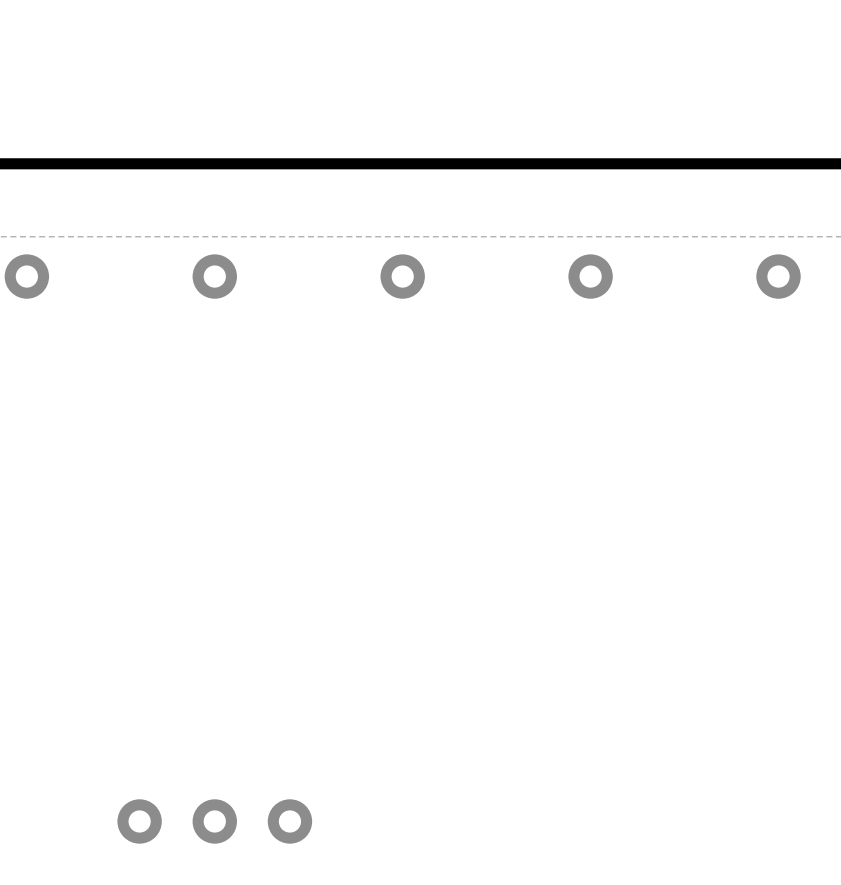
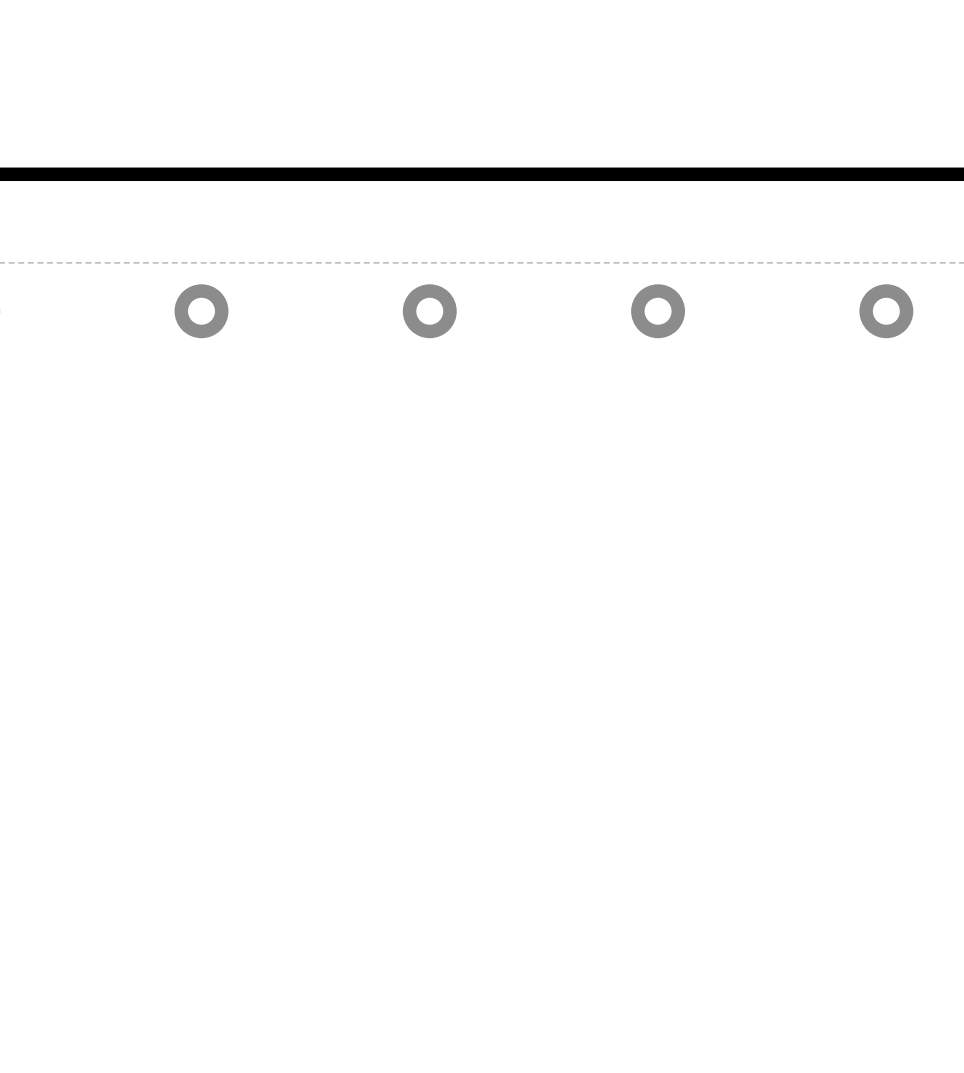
part: (139, 821) -> none
part: (214, 821) -> none
part: (289, 821) -> none

